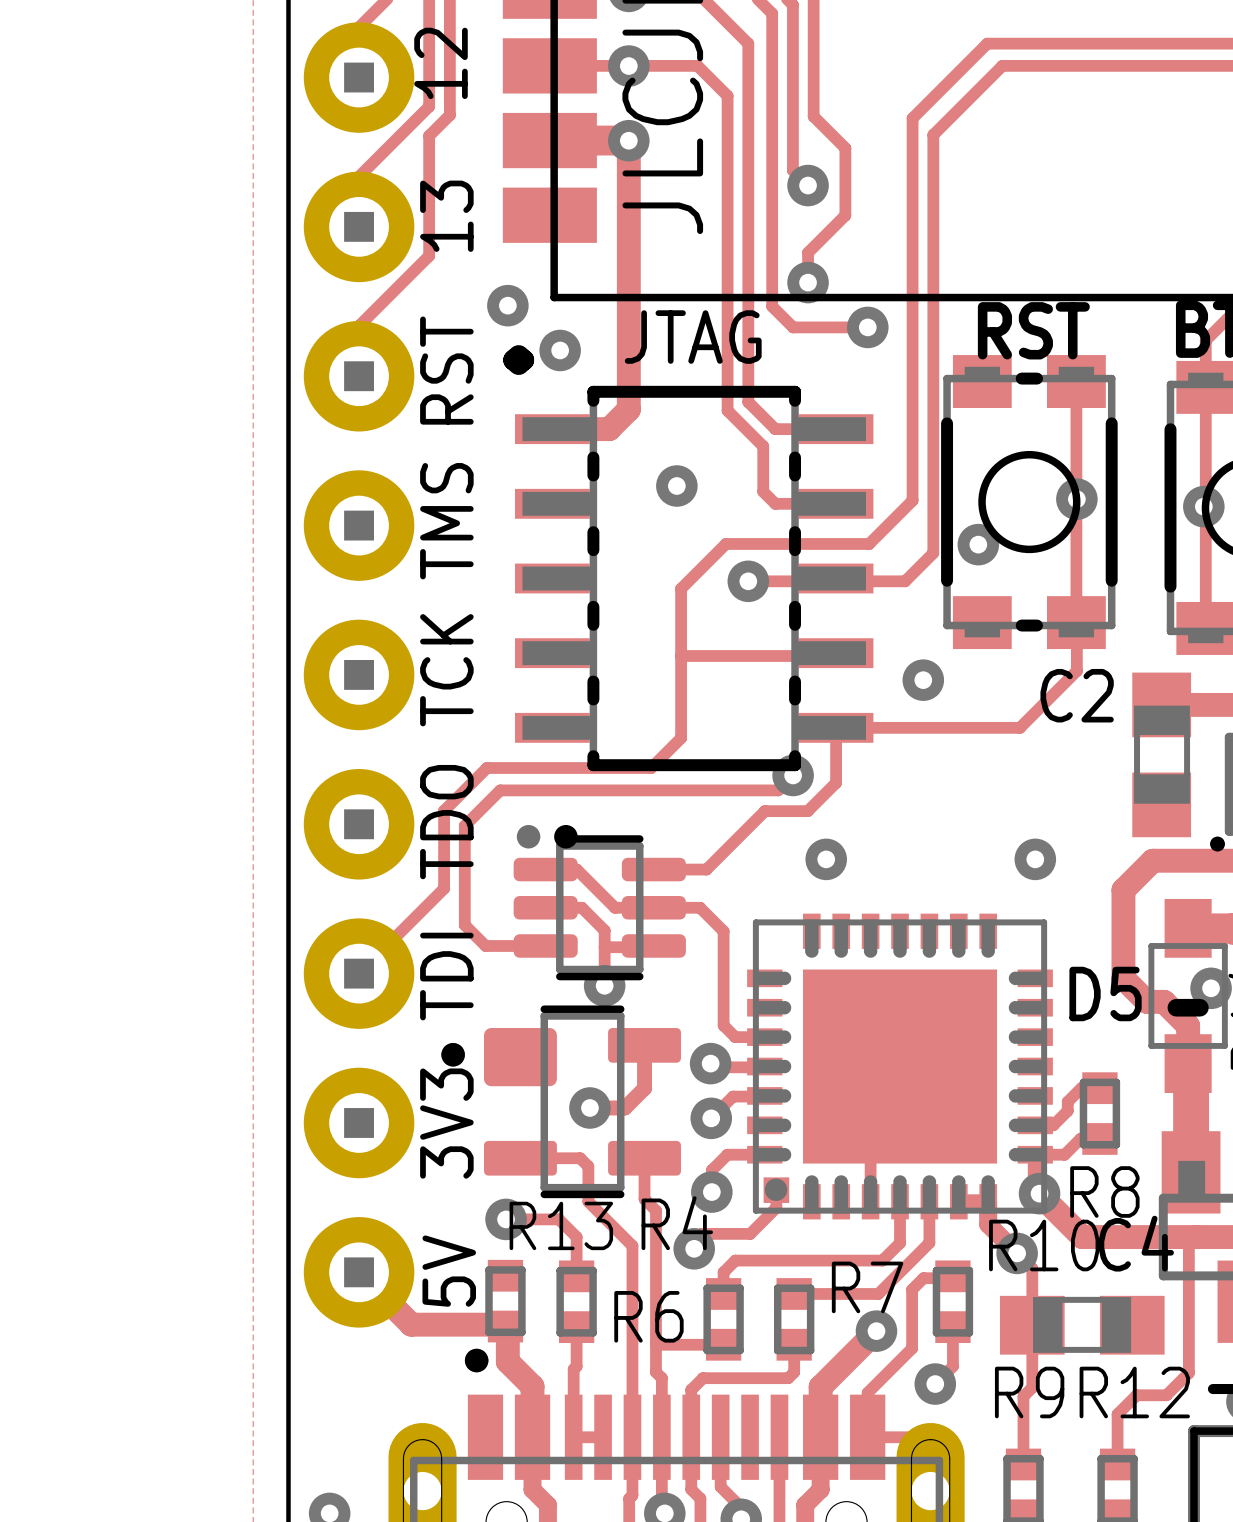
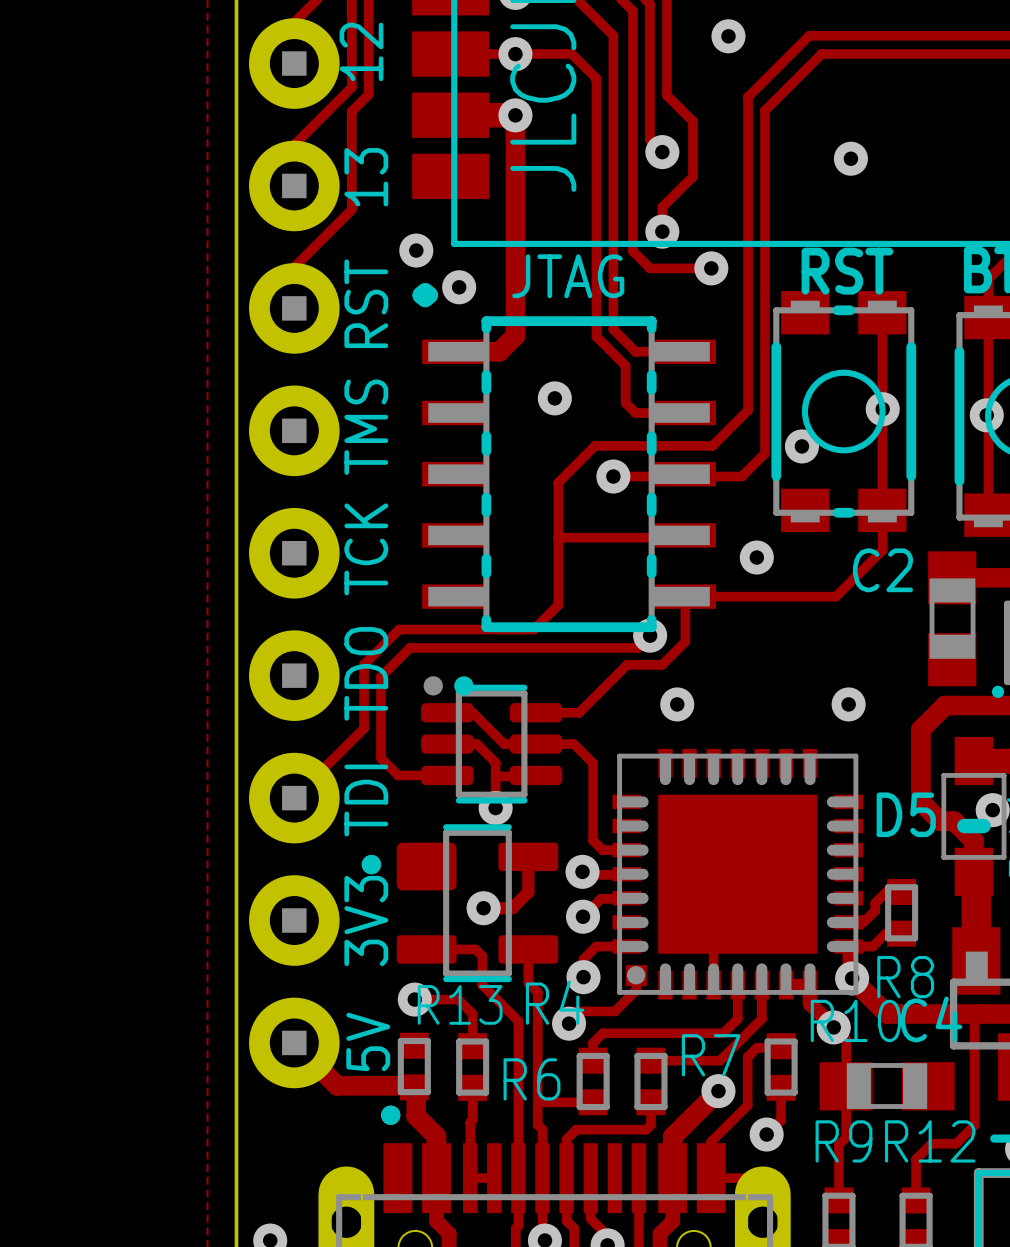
via: none -> (728, 36)
via: none -> (850, 158)

